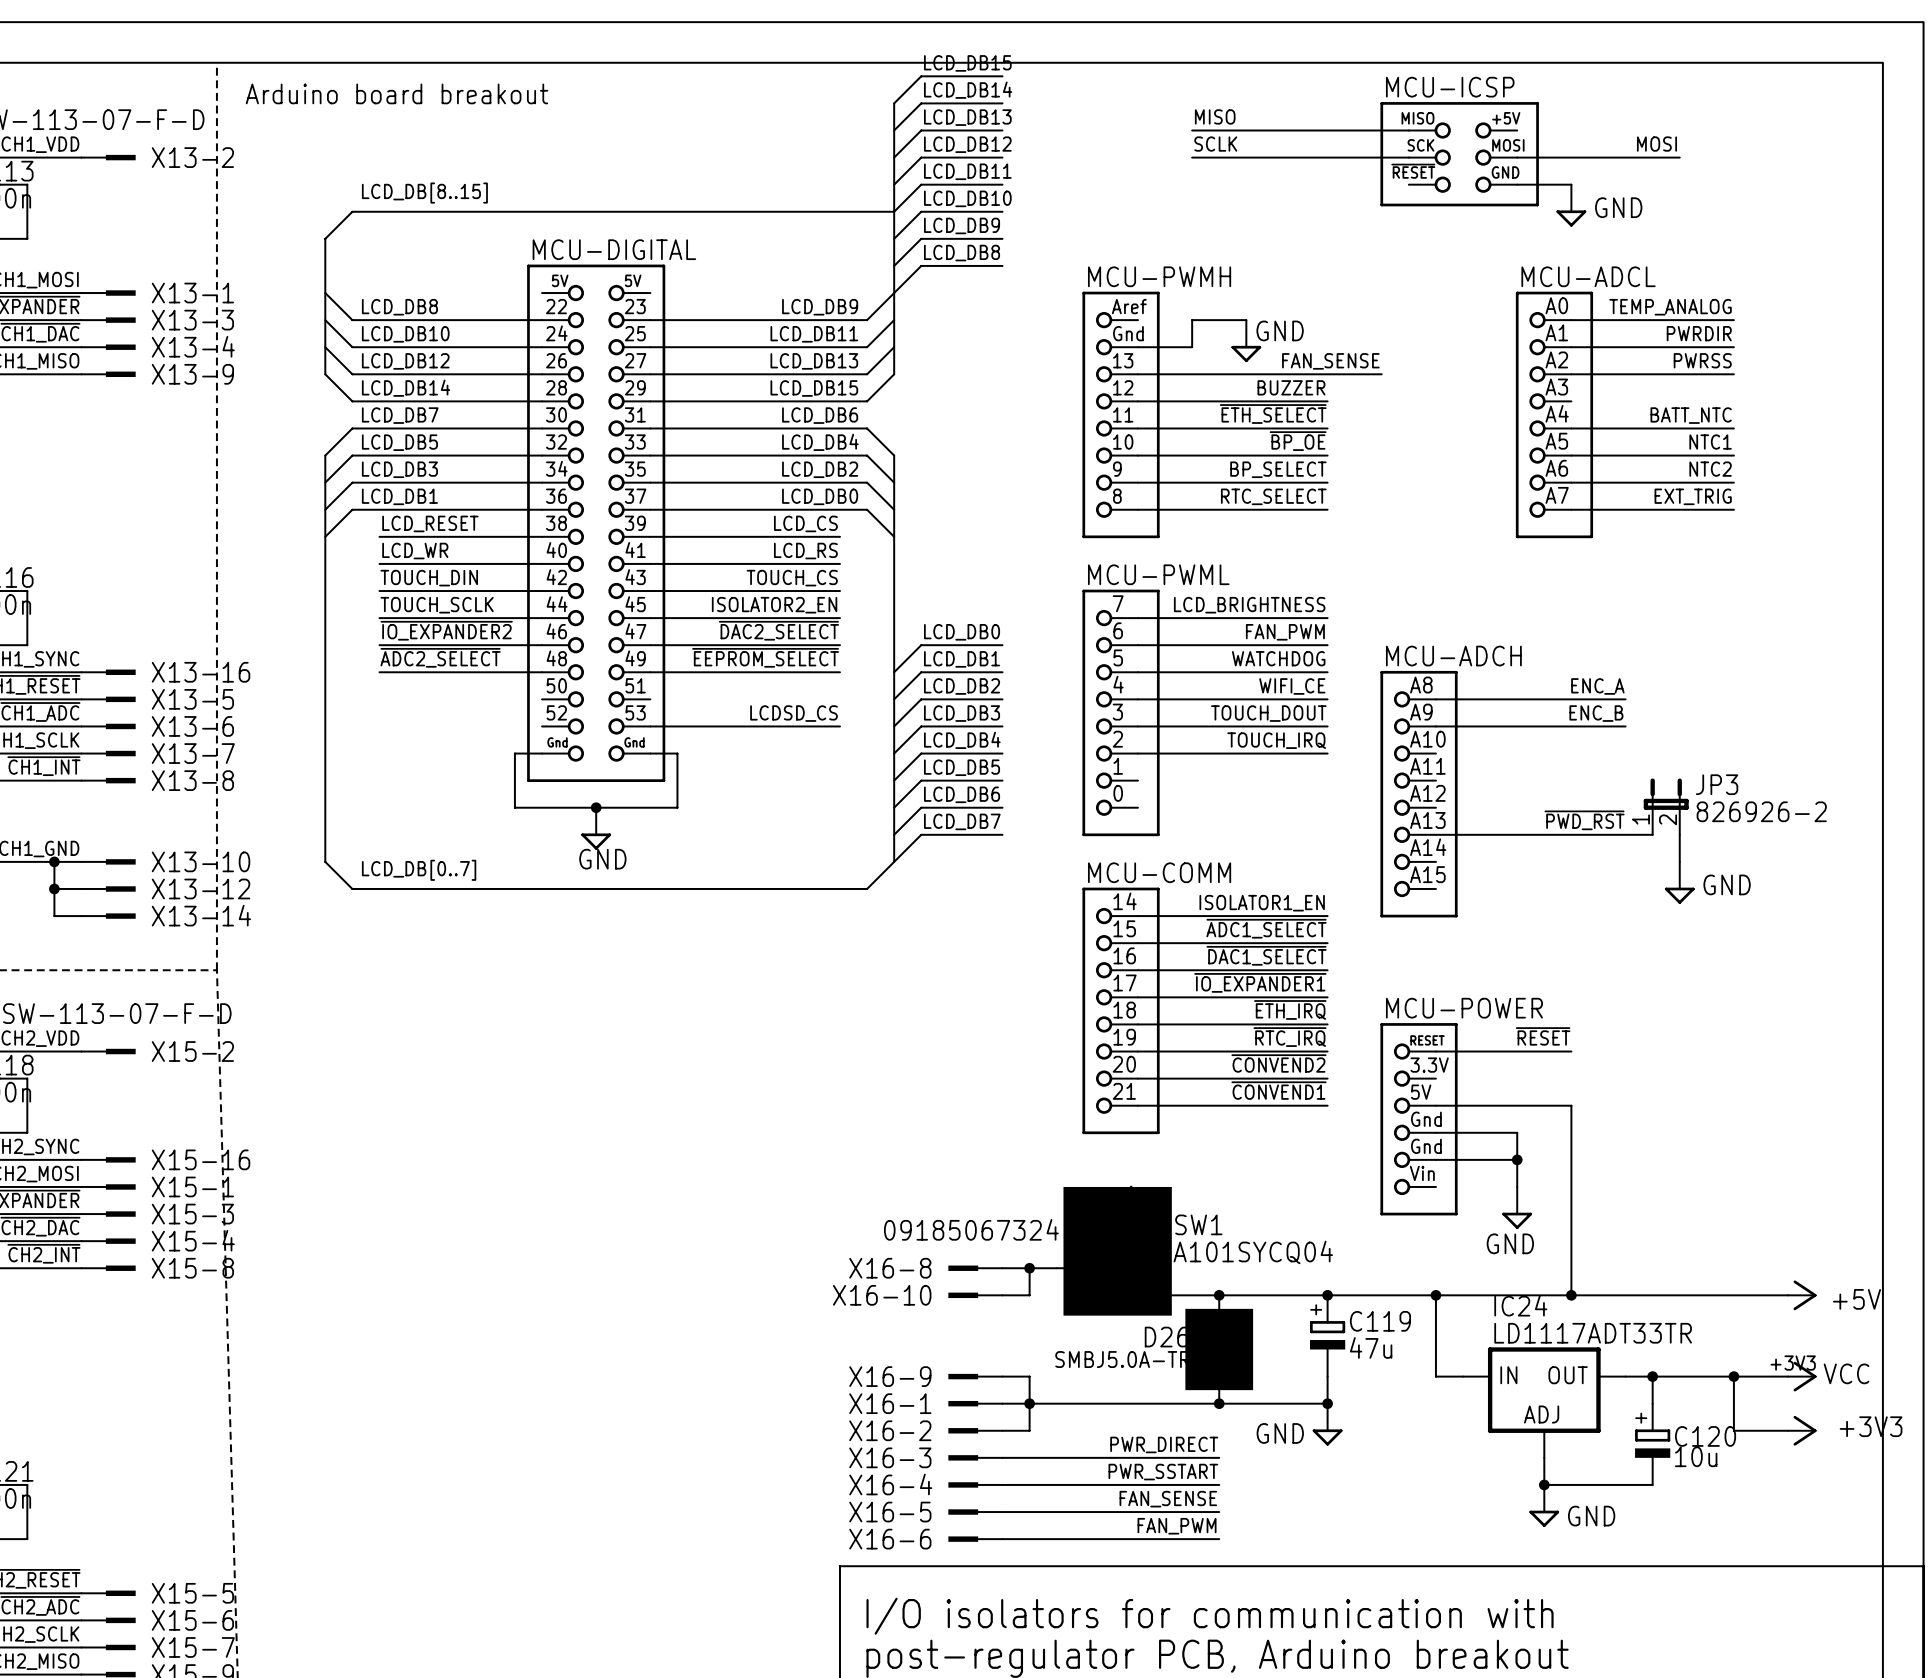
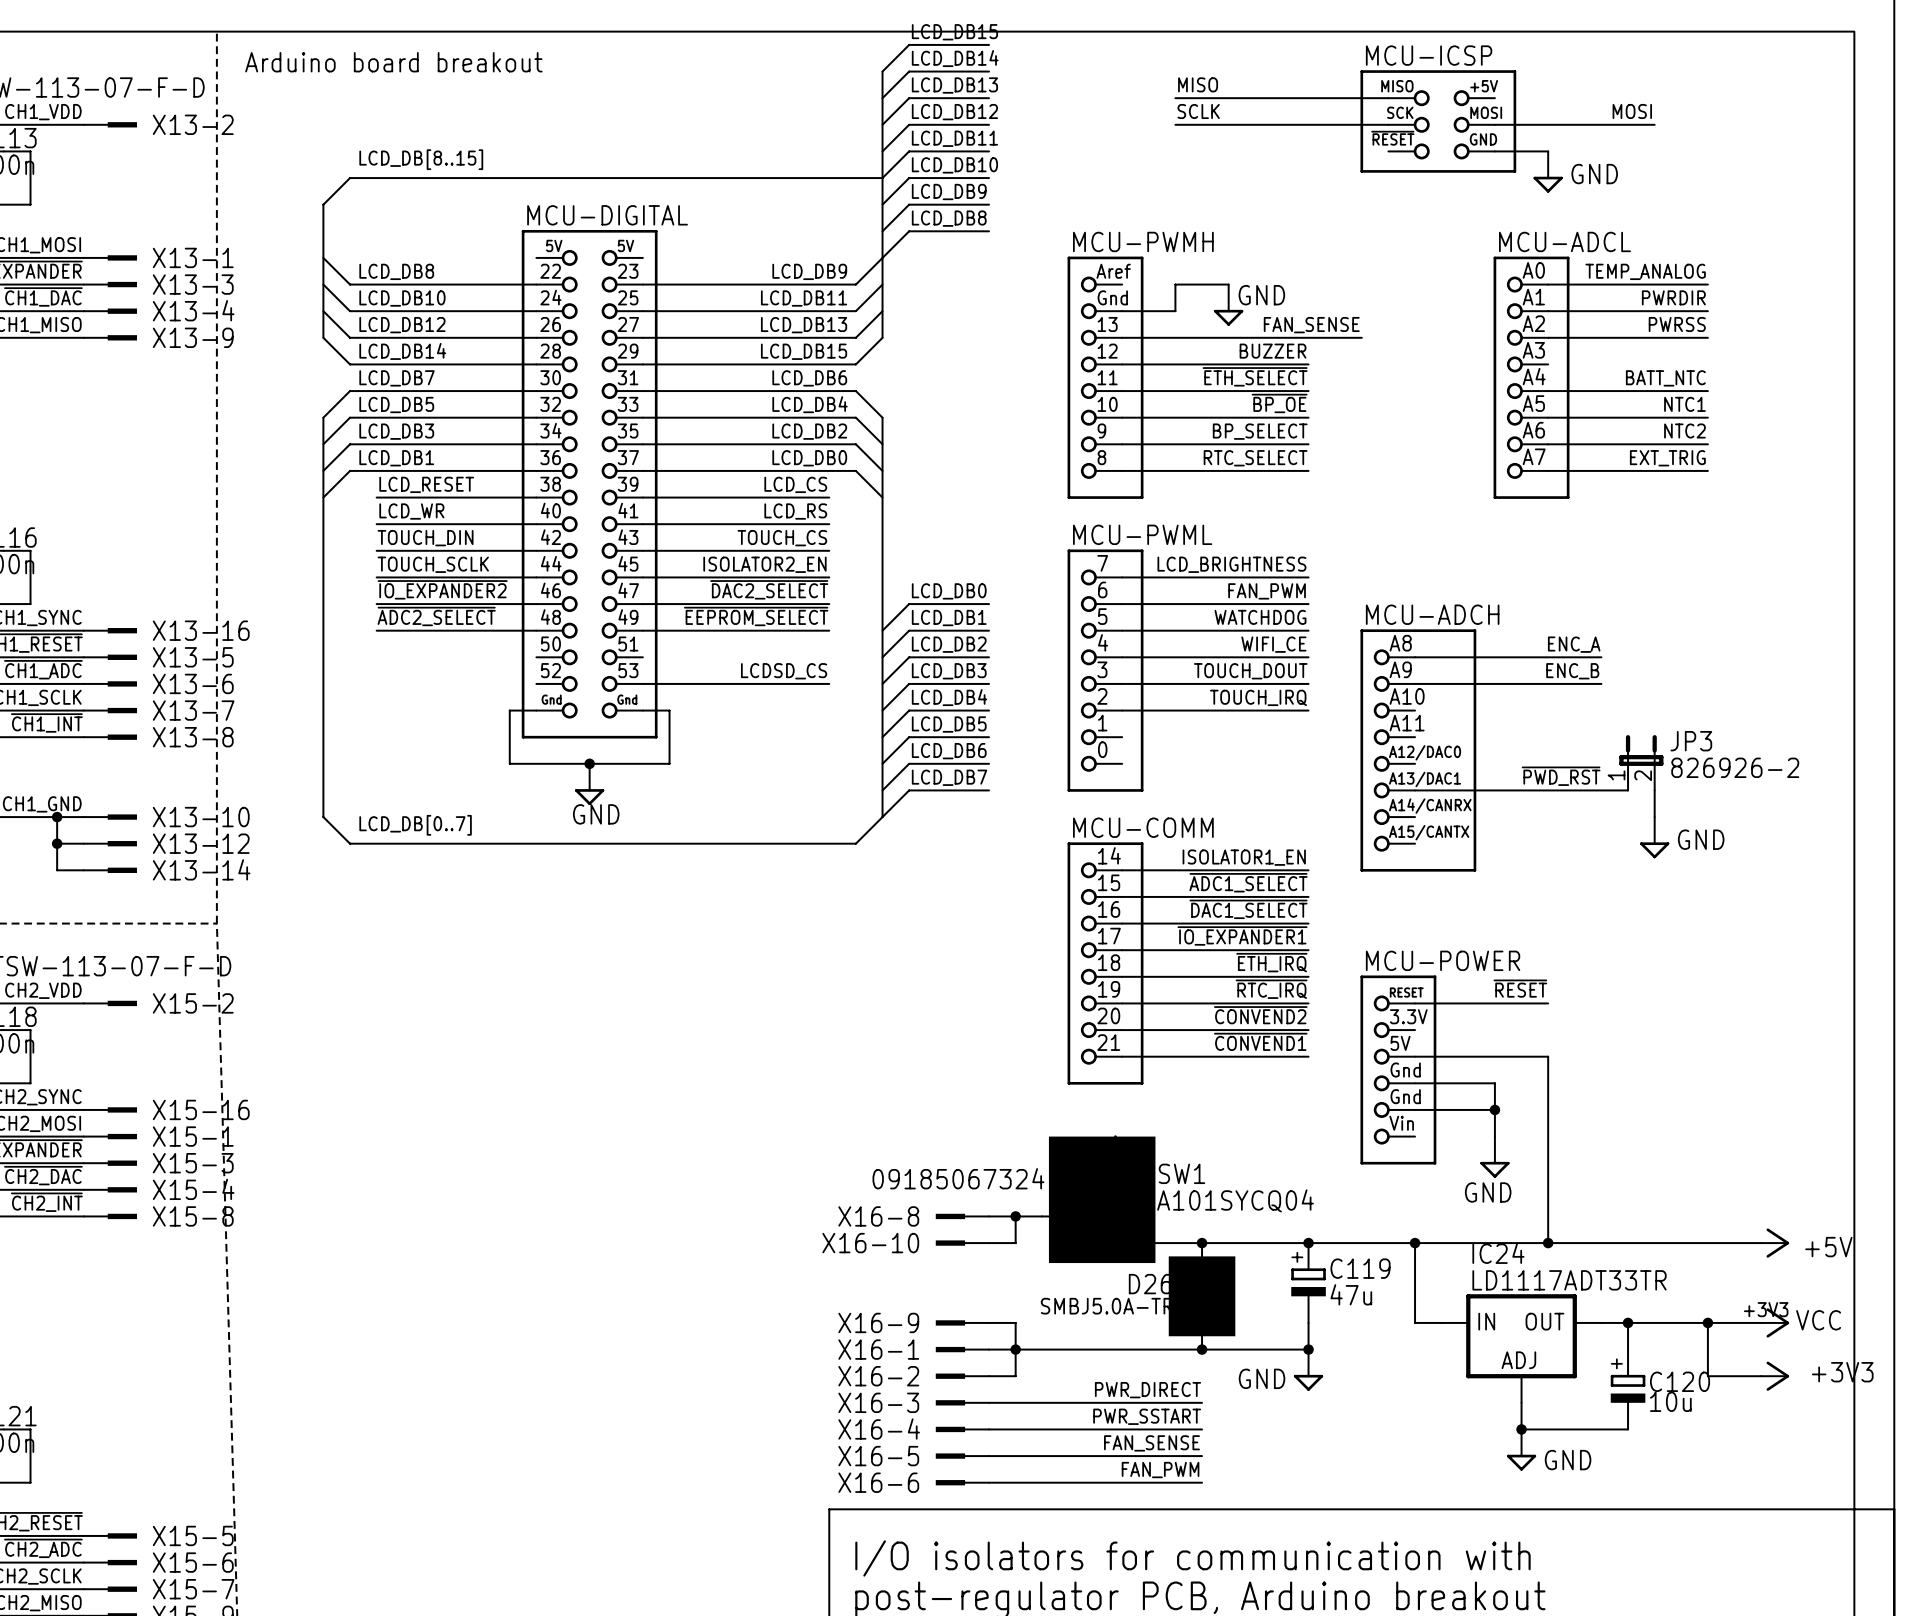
MCU-ADCH: (1419, 794) -> none
MCU-ADCH: none -> (1418, 750)

